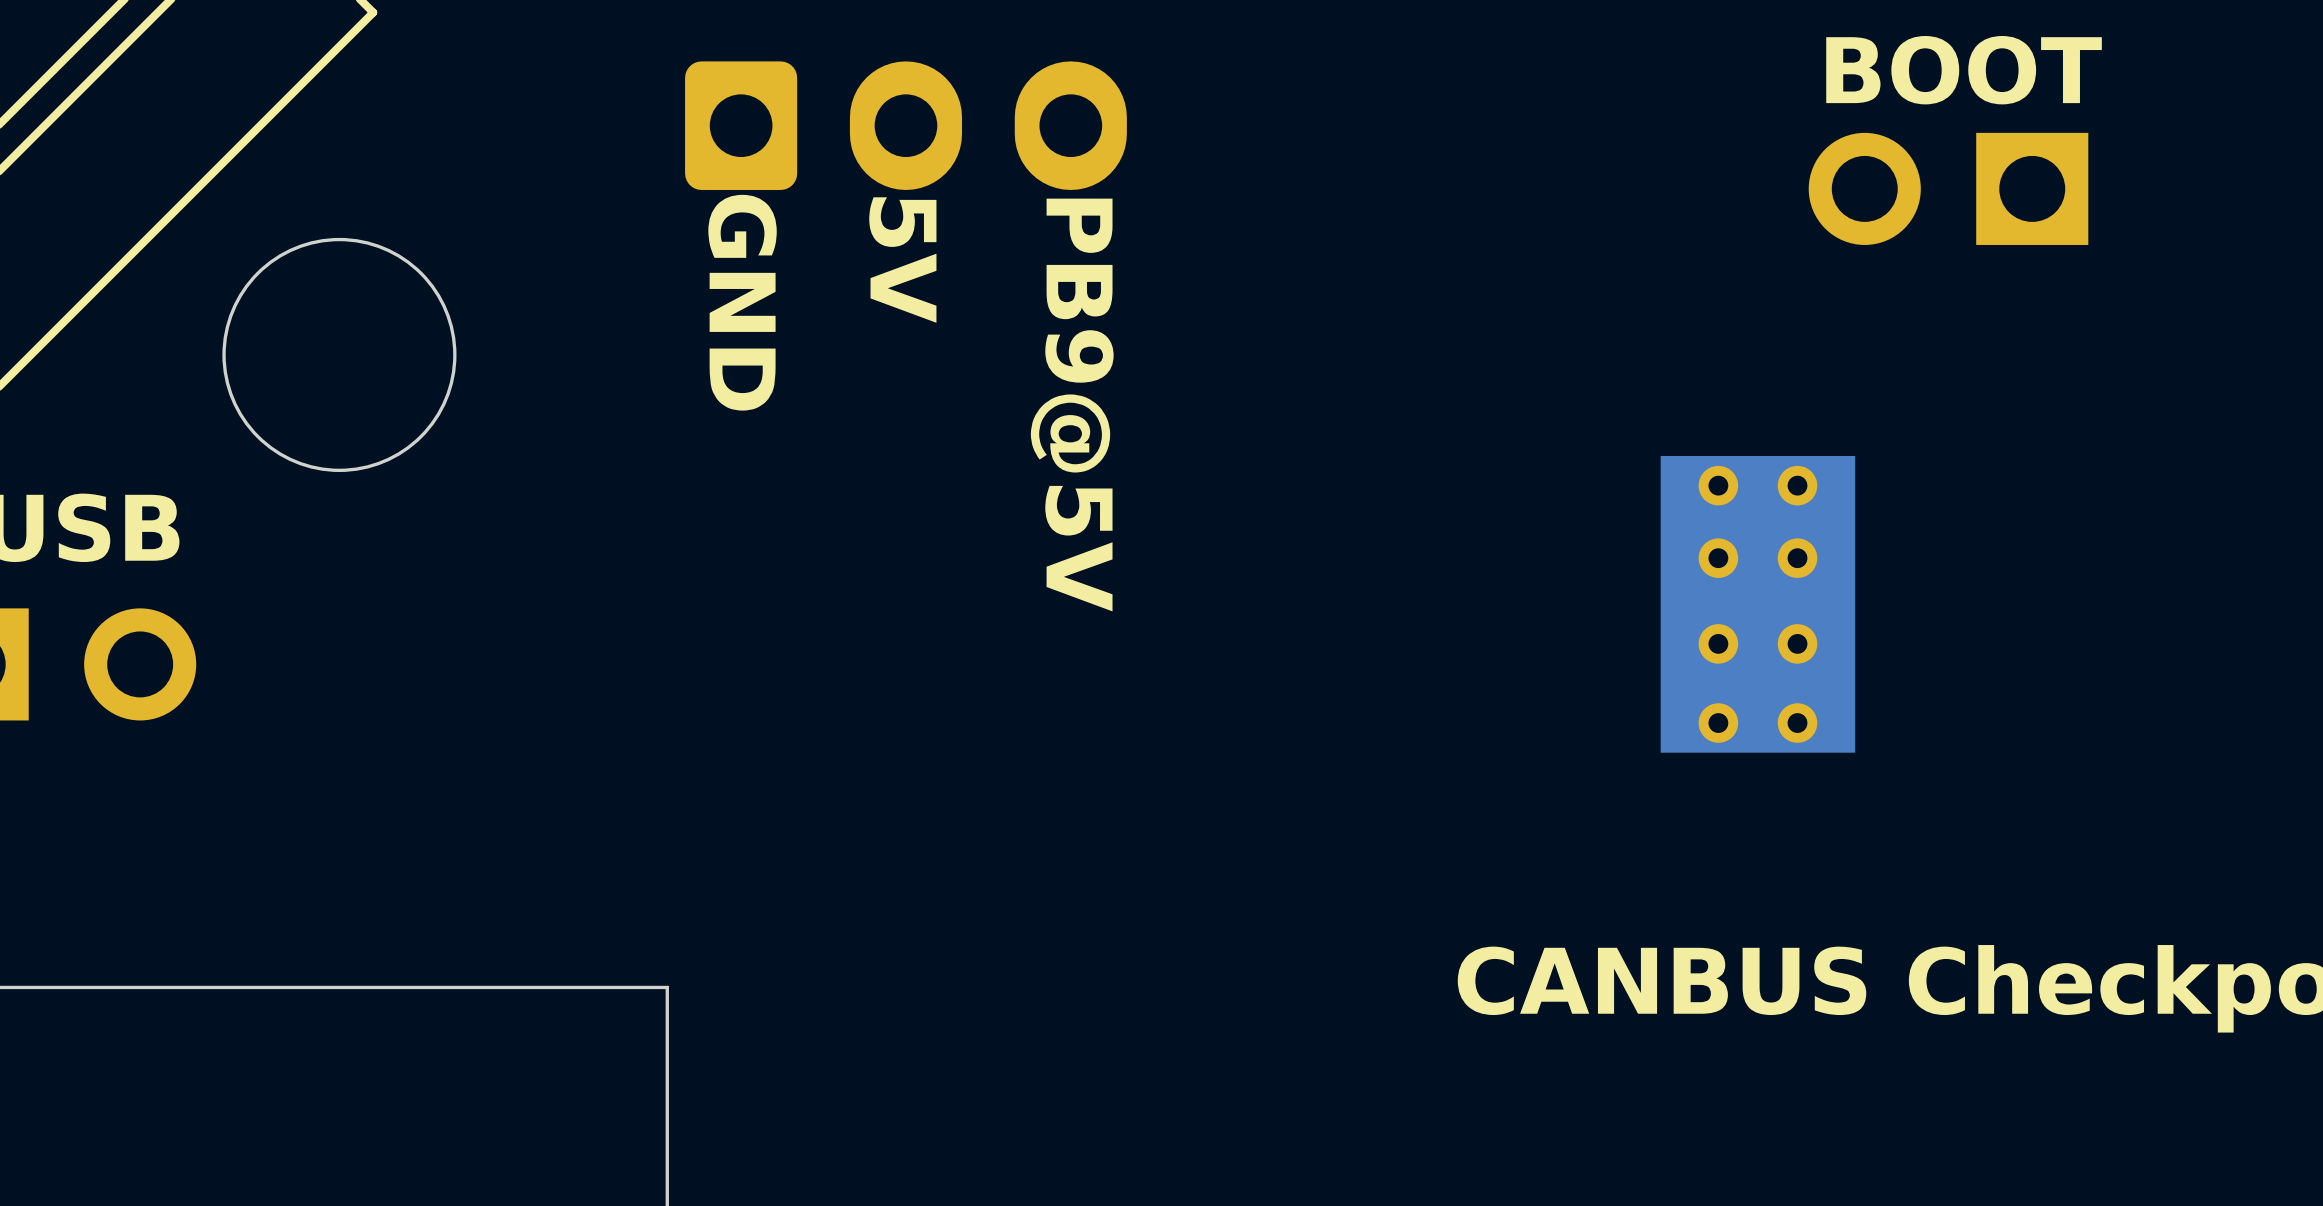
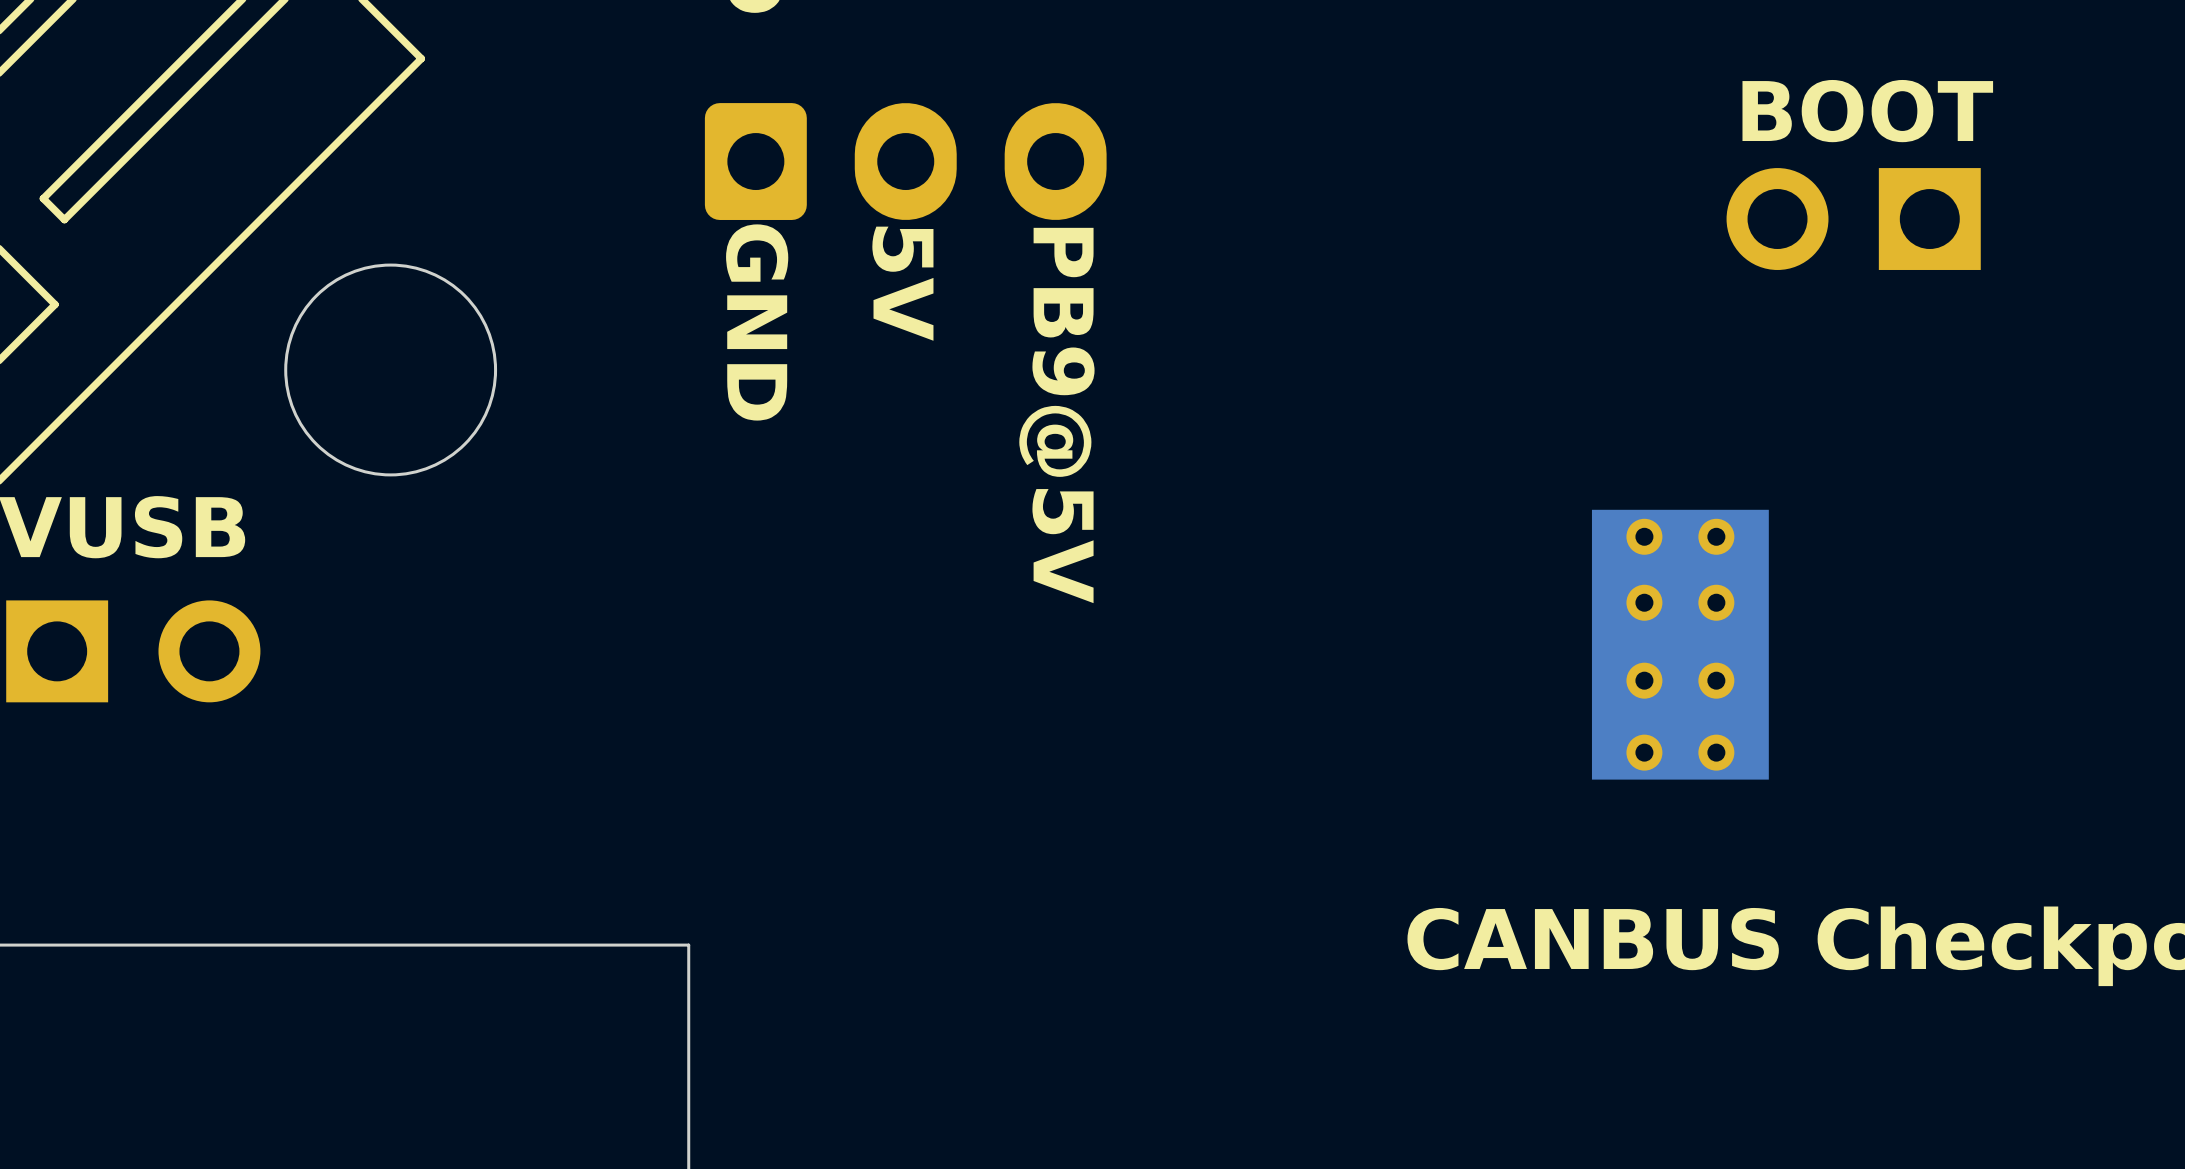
part position: (1757, 604) -> (1680, 644)

